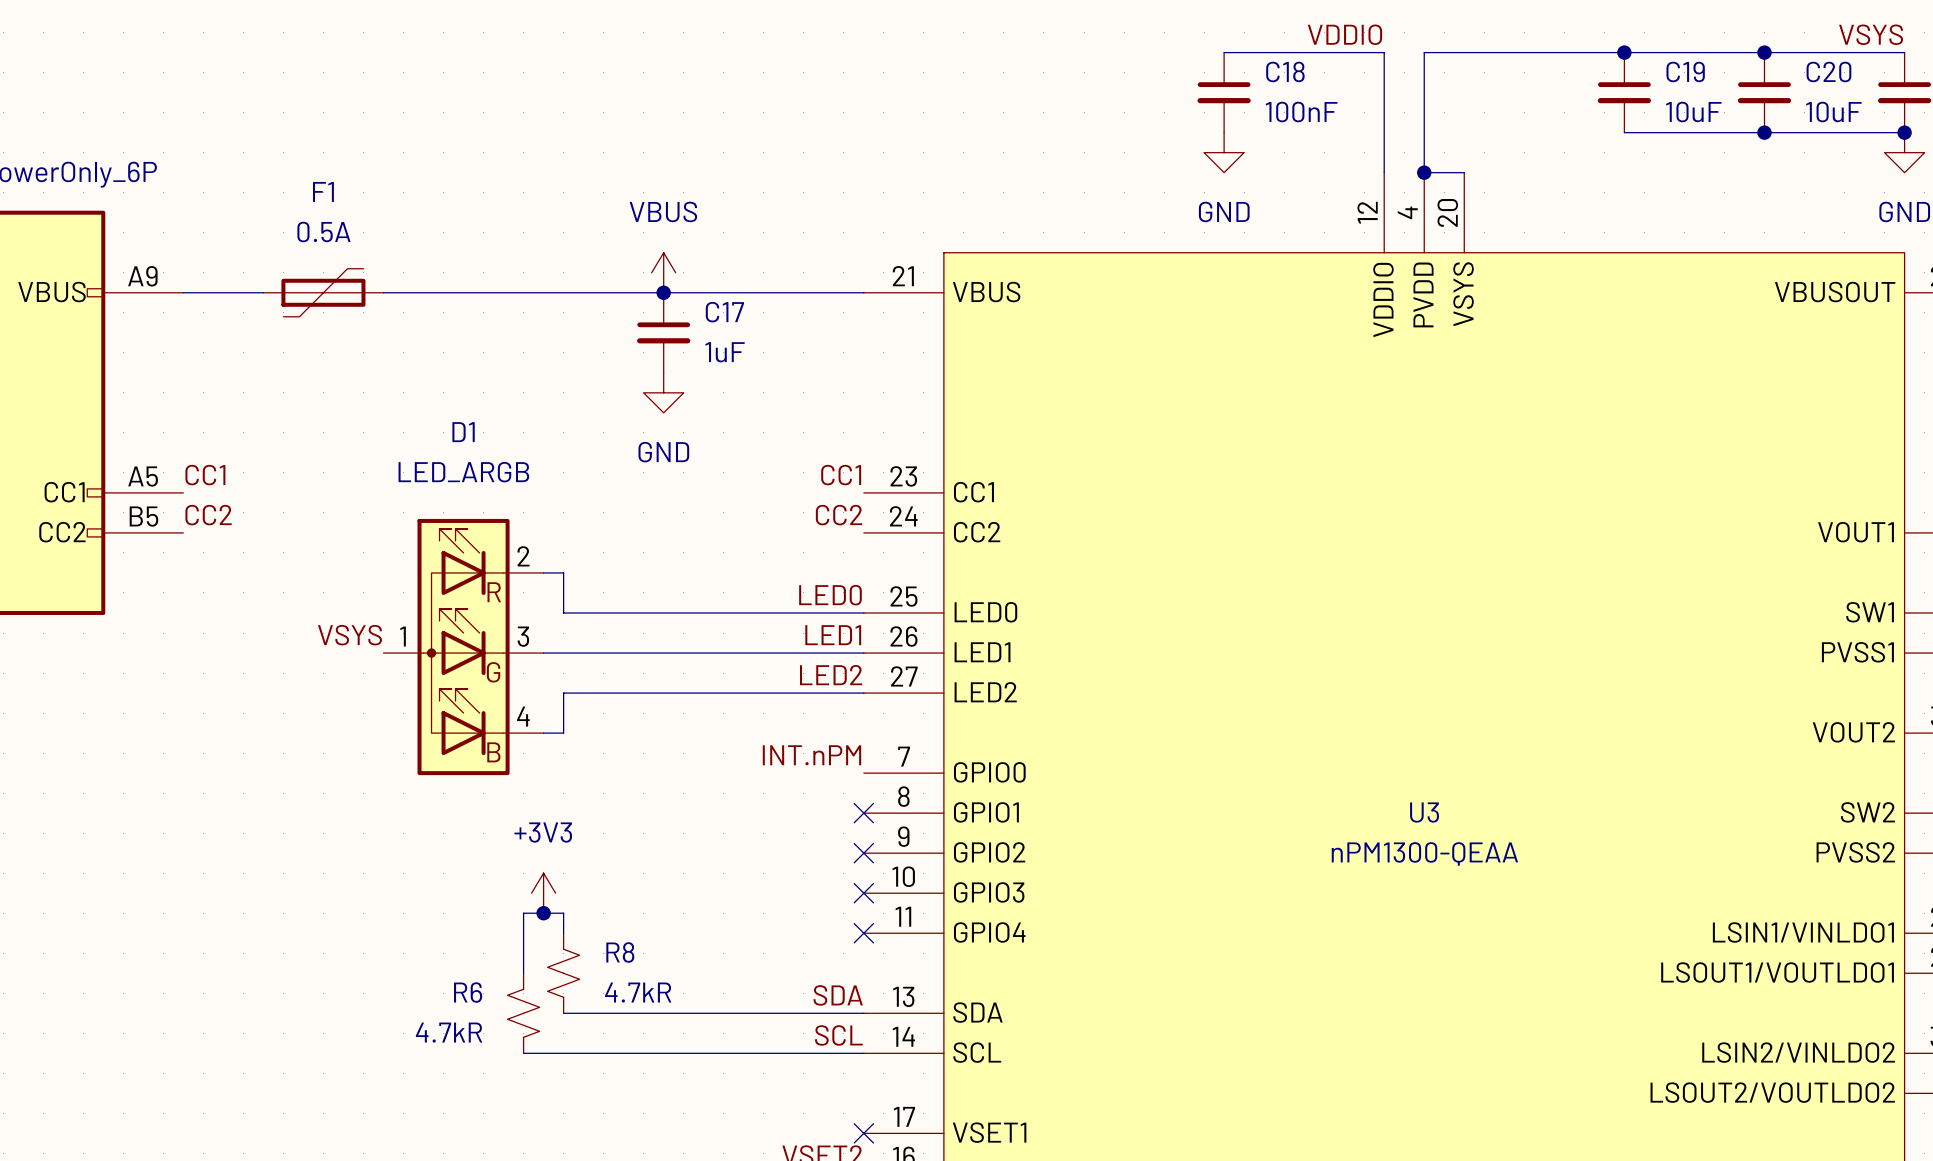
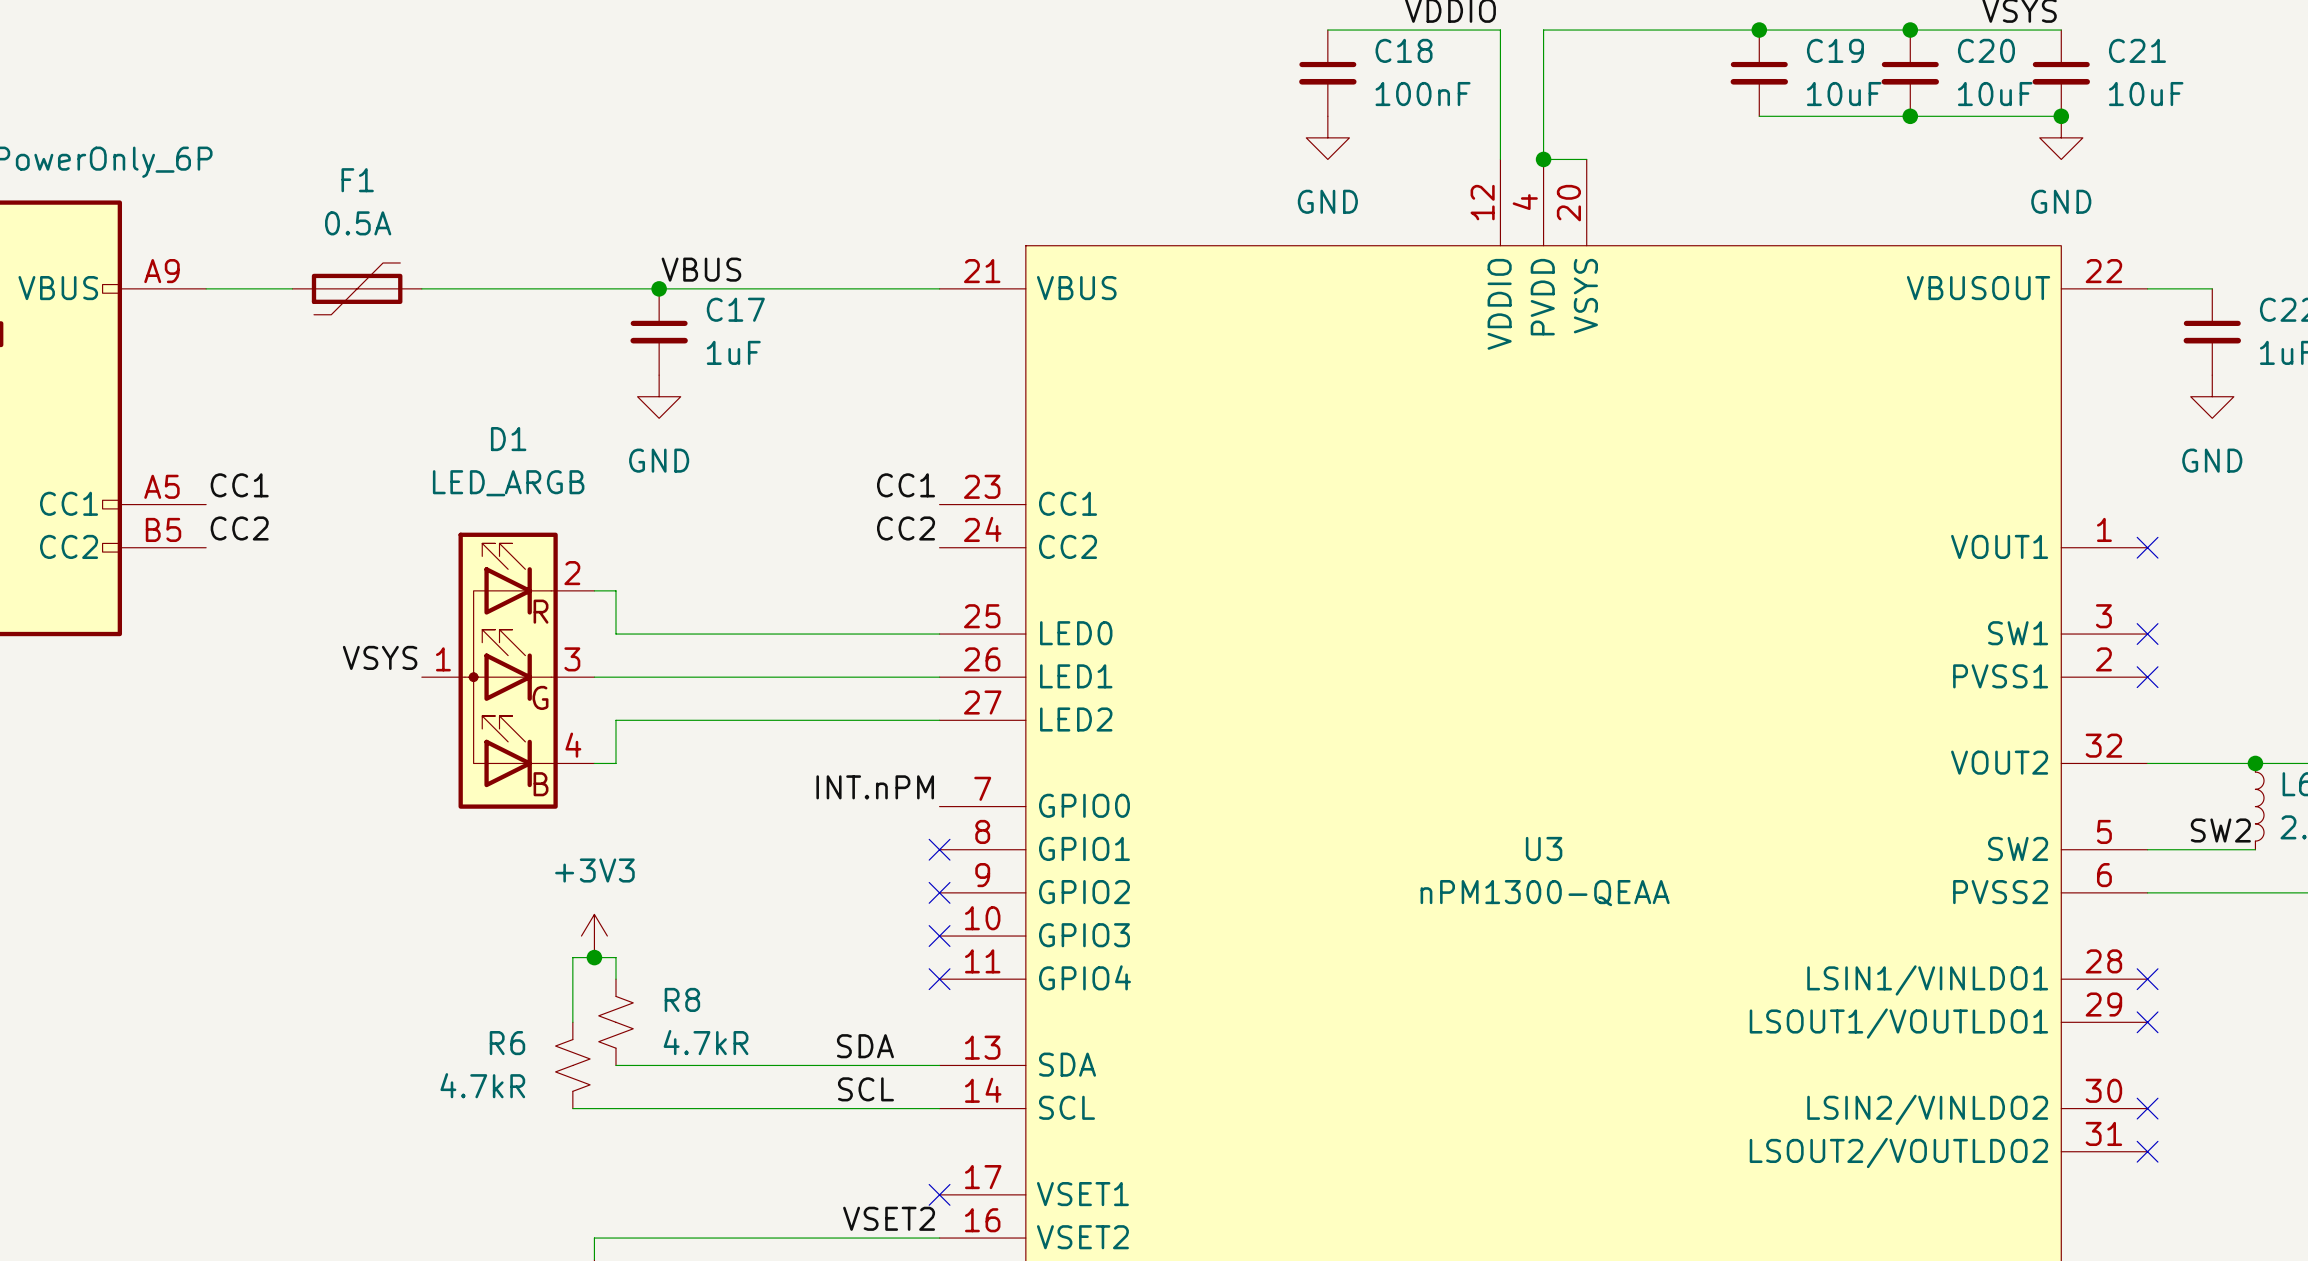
power symbol: VBUS (663, 272) -> none
label: none -> VBUS (701, 269)
junction position: (663, 292) -> (659, 288)
C17 position: (663, 332) -> (659, 332)
power symbol position: GND (663, 392) -> GND (659, 396)
label: LED0 (830, 595) -> none
label: LED1 (833, 635) -> none
label: LED2 (831, 675) -> none
label position: SDA (838, 995) -> SDA (865, 1046)
label position: SCL (838, 1035) -> SCL (865, 1089)

